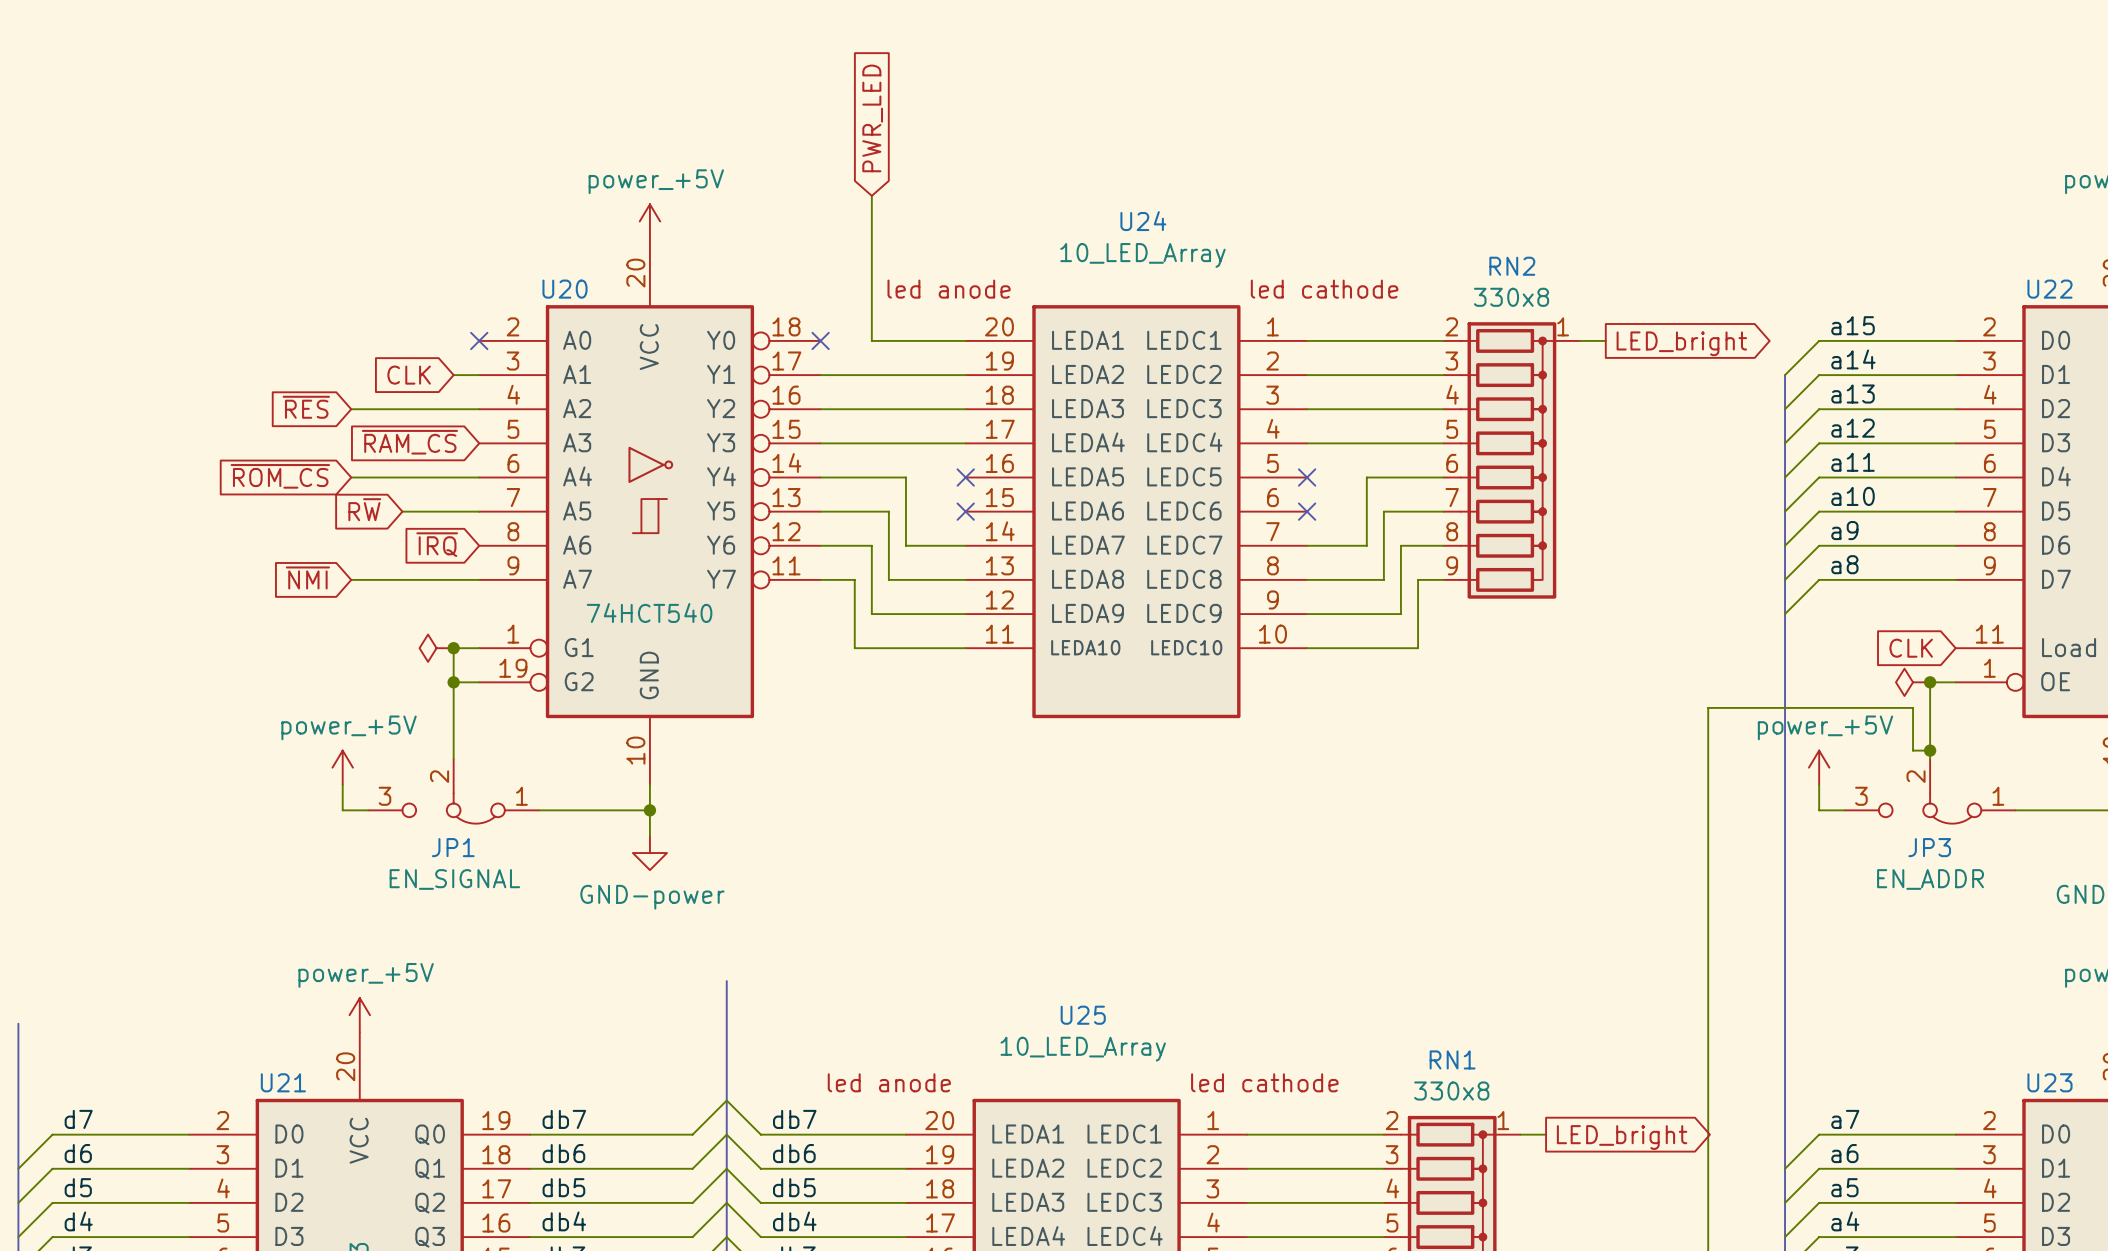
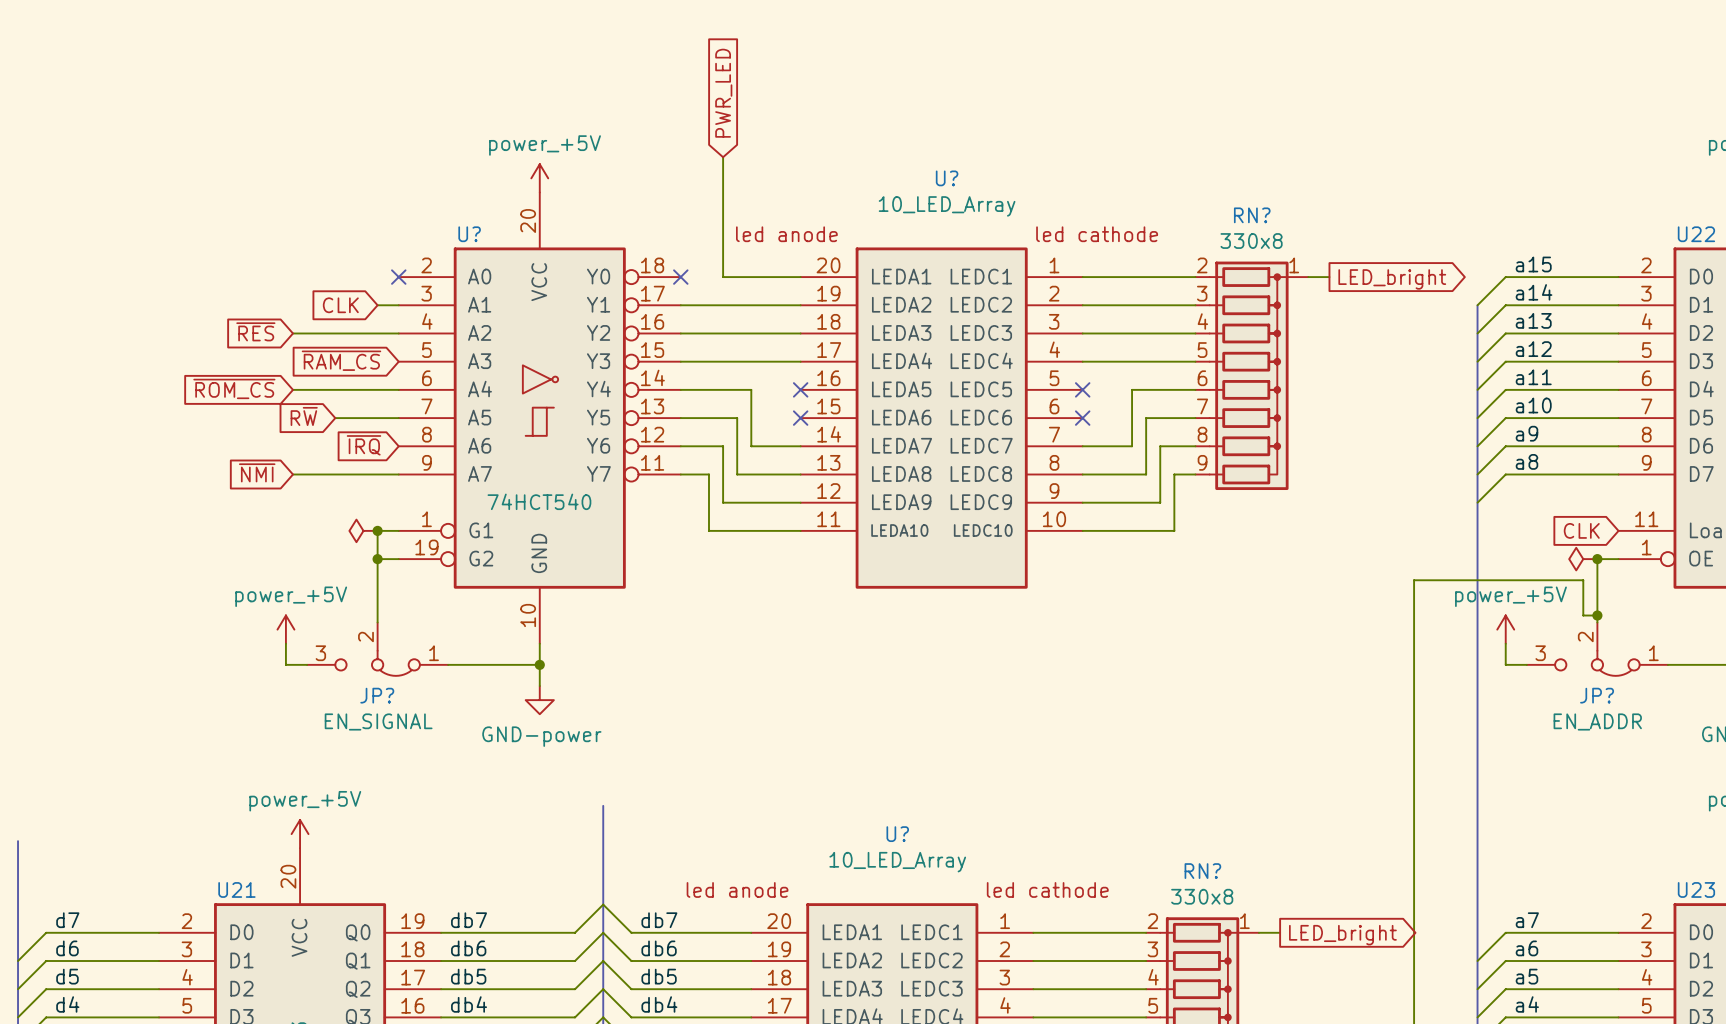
U24 name: U24 (1143, 221) -> U? (947, 178)
RN2 name: RN2 (1512, 266) -> RN? (1252, 215)
U20 name: U20 (565, 289) -> U? (469, 234)
JP1 name: JP1 (453, 847) -> JP? (377, 695)
JP3 name: JP3 (1929, 847) -> JP? (1597, 695)
U25 name: U25 (1083, 1015) -> U? (897, 834)
RN1 name: RN1 (1452, 1059) -> RN? (1202, 871)

